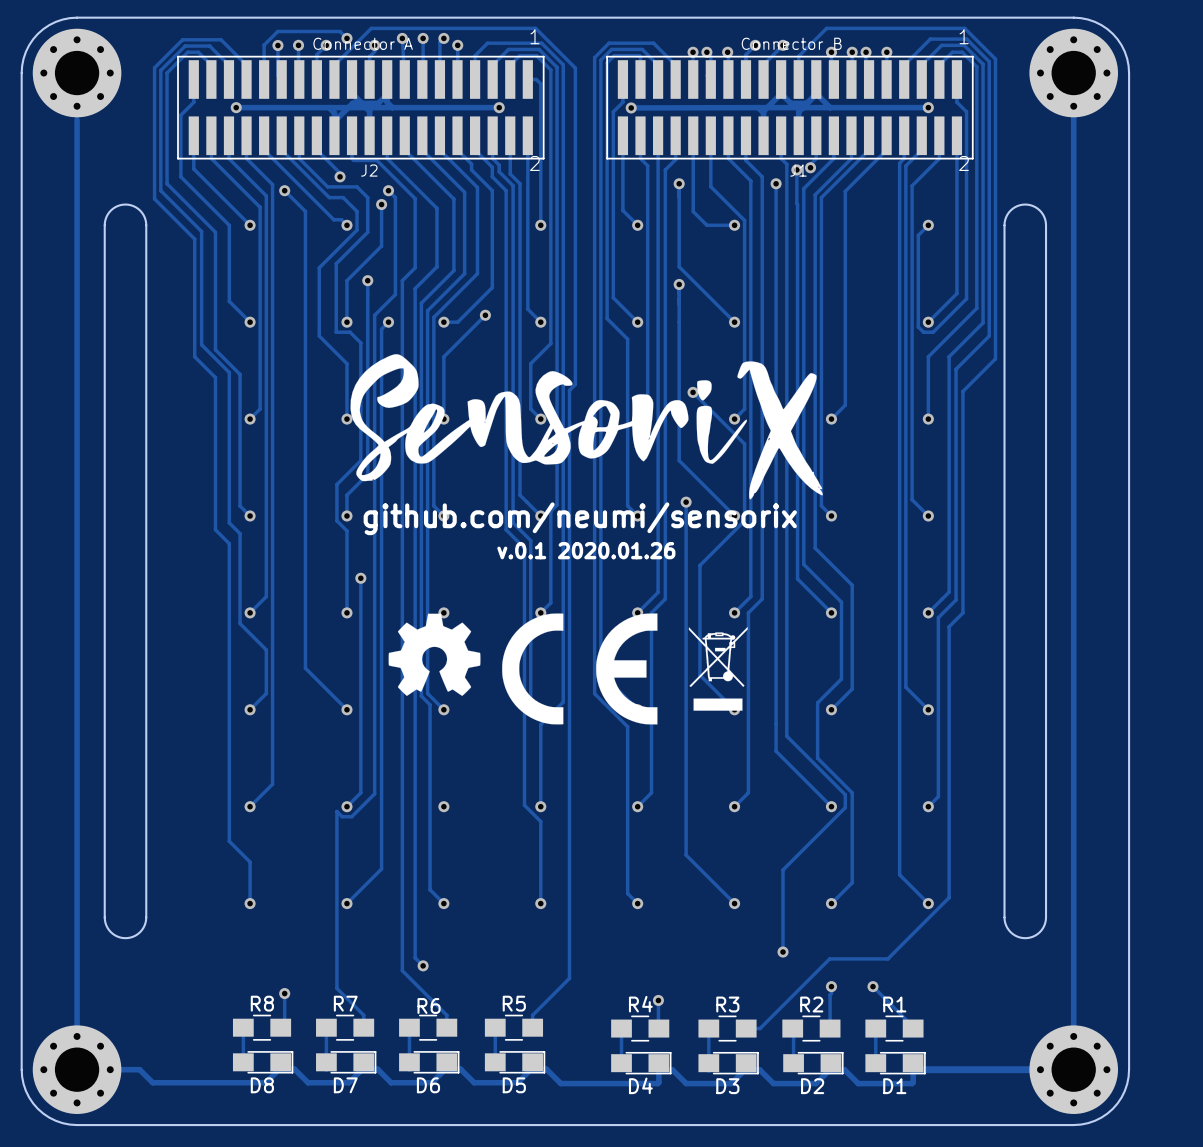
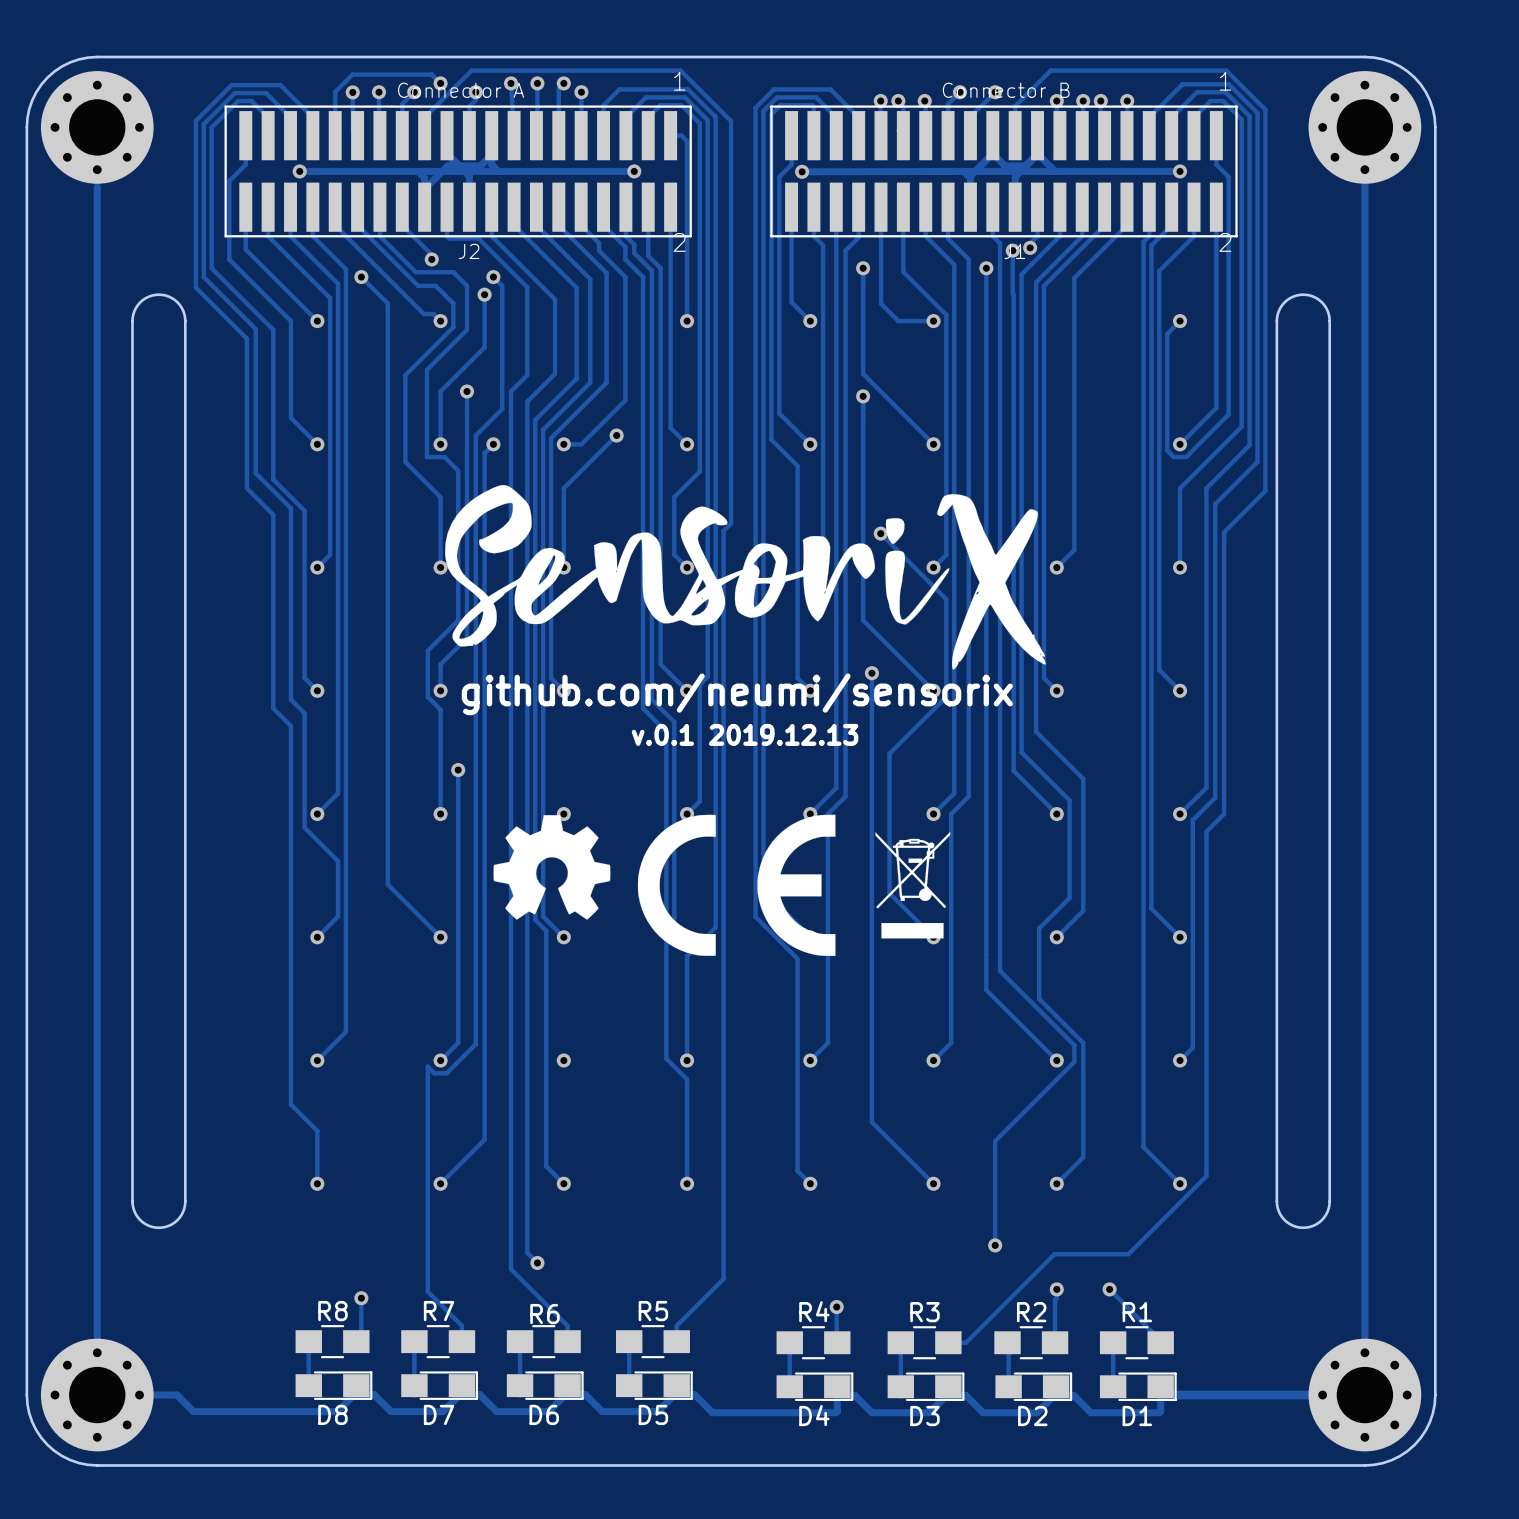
text: v.0.1 2020.01.26 (586, 550) -> v.0.1 2019.12.13 (745, 734)

